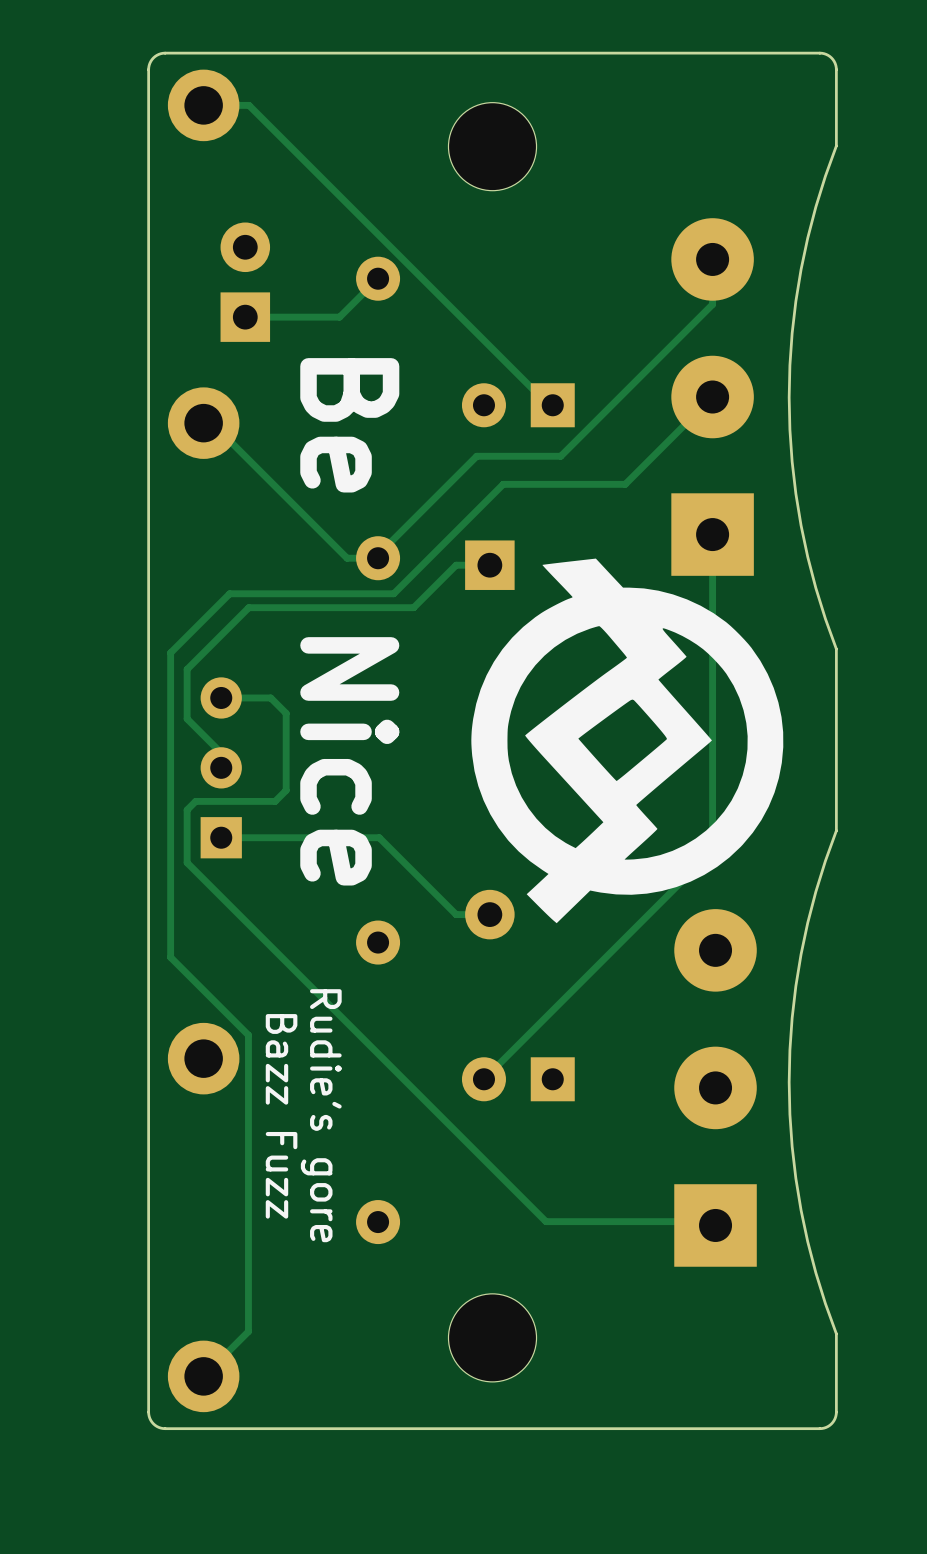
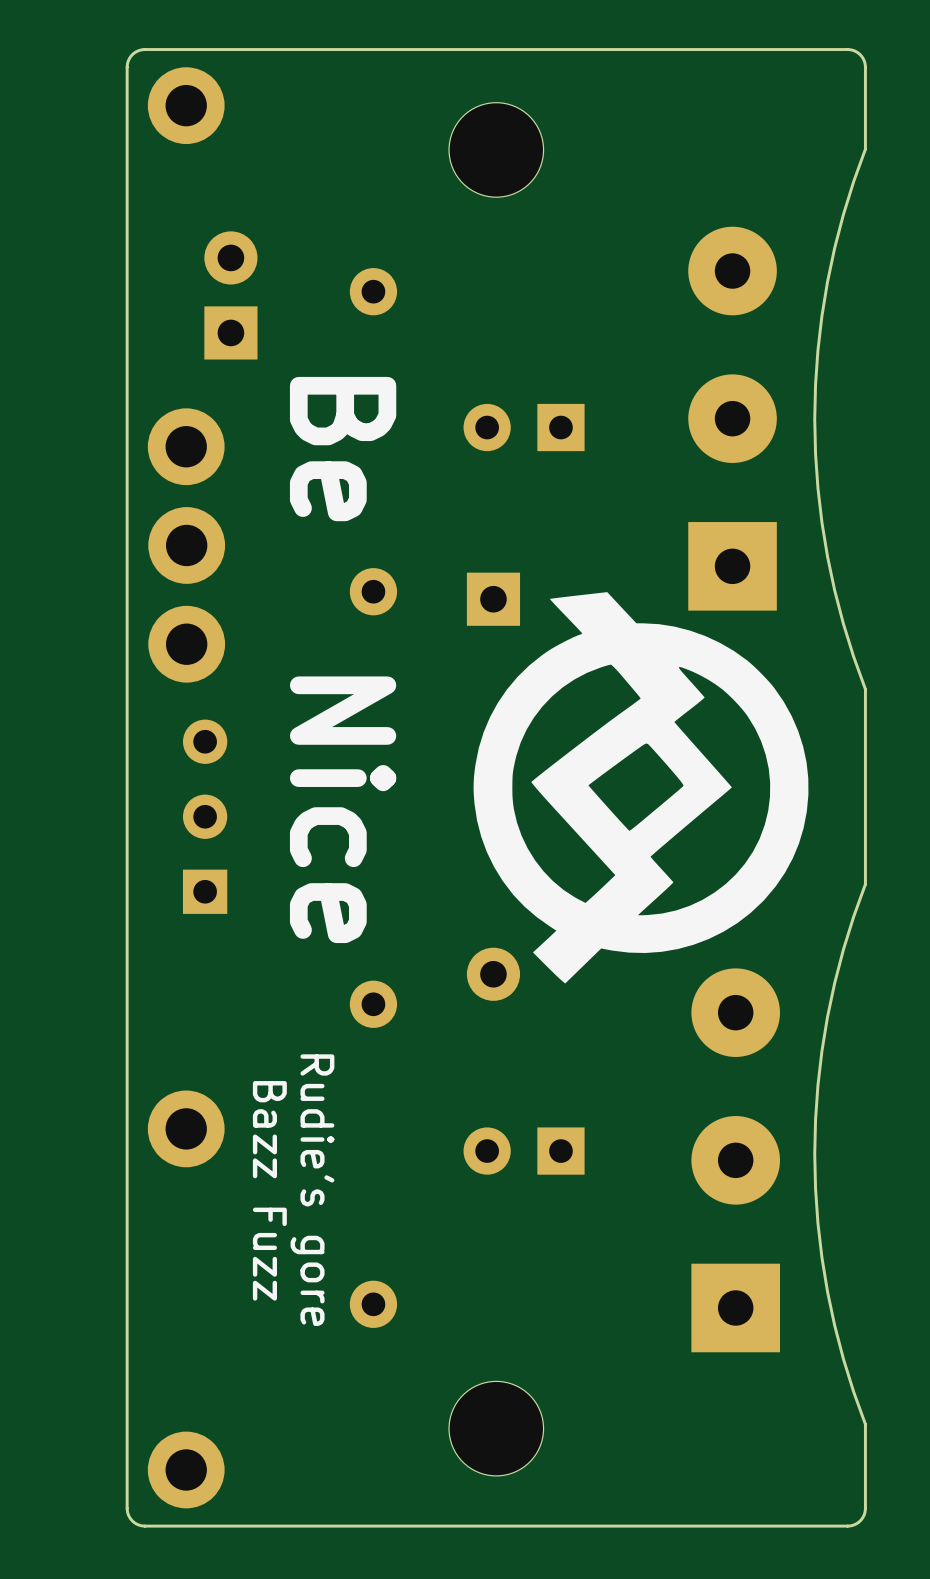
track: (203, 105) (249, 105) (548, 405) (552, 405) -> none
track: (712, 259) (712, 304) (560, 456) (476, 456) (374, 558) -> none
track: (378, 278) (339, 317) (245, 317) -> none
track: (712, 397) (625, 484) (503, 484) (393, 593) (229, 593) (170, 652) (170, 957) (248, 1035) (248, 1331) (203, 1376) -> none
track: (203, 423) (212, 423) (347, 558) (378, 558) -> none
part: none -> (186, 545)
track: (712, 534) (712, 850) (483, 1079) -> none
track: (489, 565) (456, 565) (413, 607) (248, 607) (187, 669) (187, 718) (221, 753) (221, 767) -> none
part: none -> (186, 644)
track: (238, 697) (270, 697) (286, 713) (286, 790) (275, 801) (195, 801) (187, 809) (187, 862) (546, 1221) (721, 1221) -> none
track: (221, 837) (379, 837) (456, 914) (489, 914) -> none

